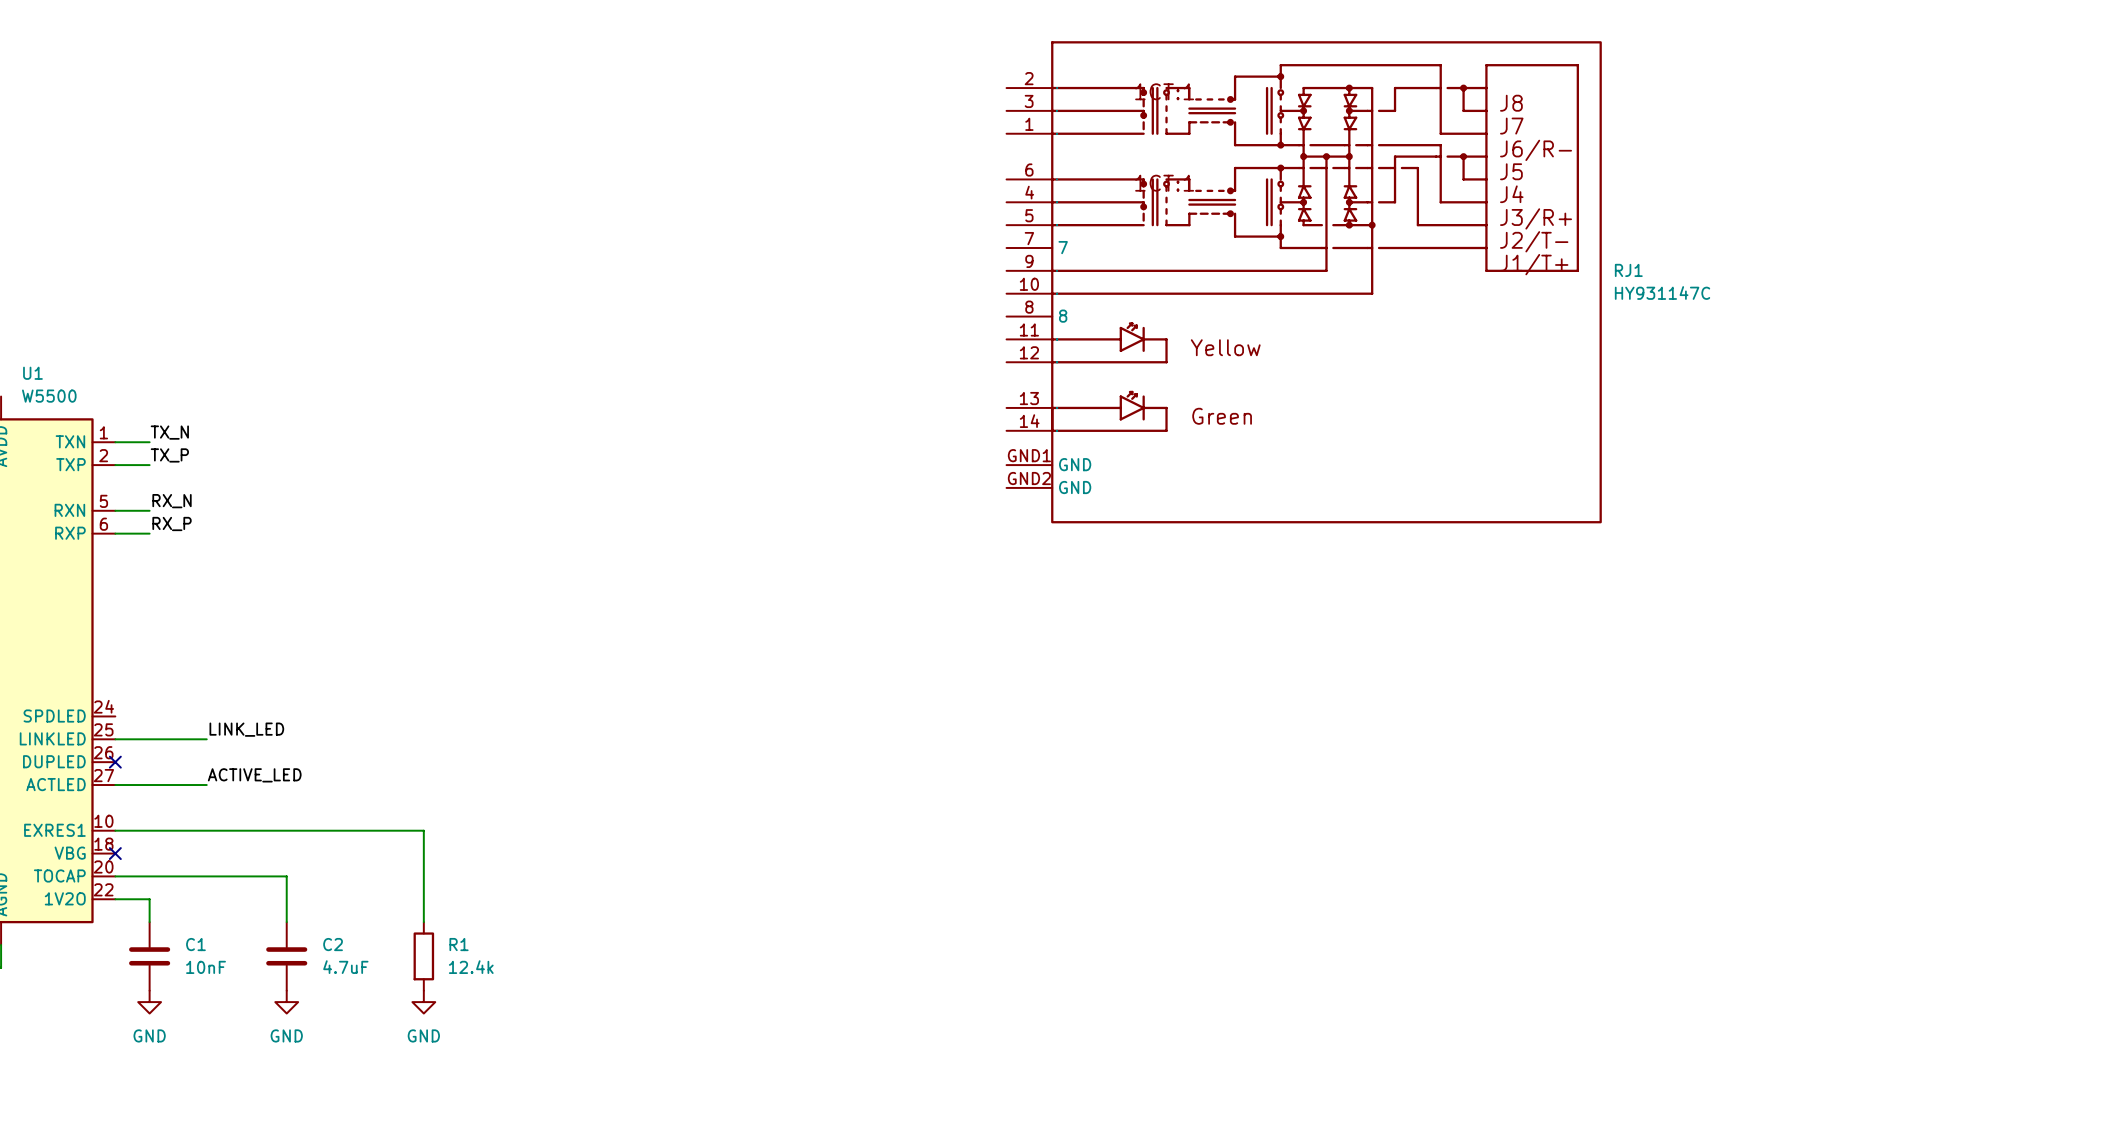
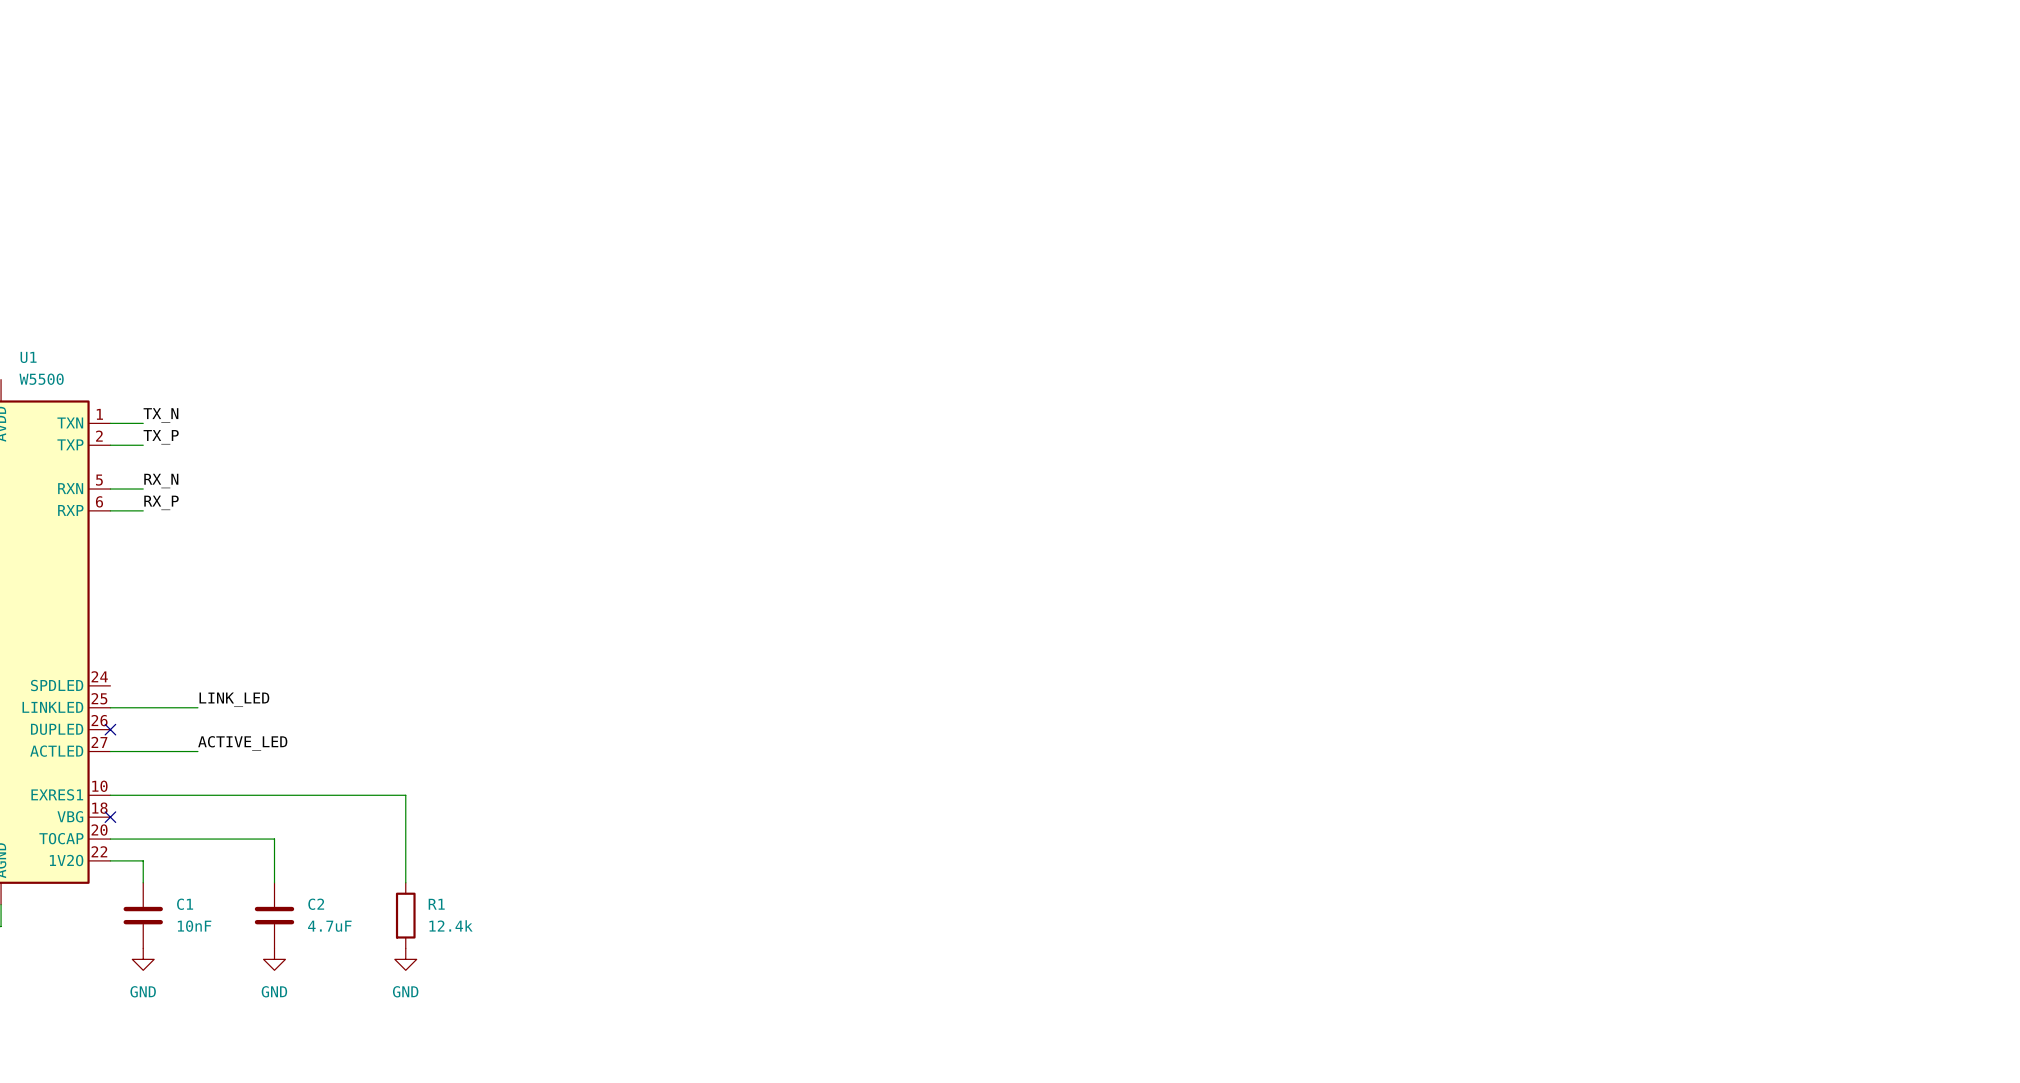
RJ1: HY931147C (1304, 282) -> none

